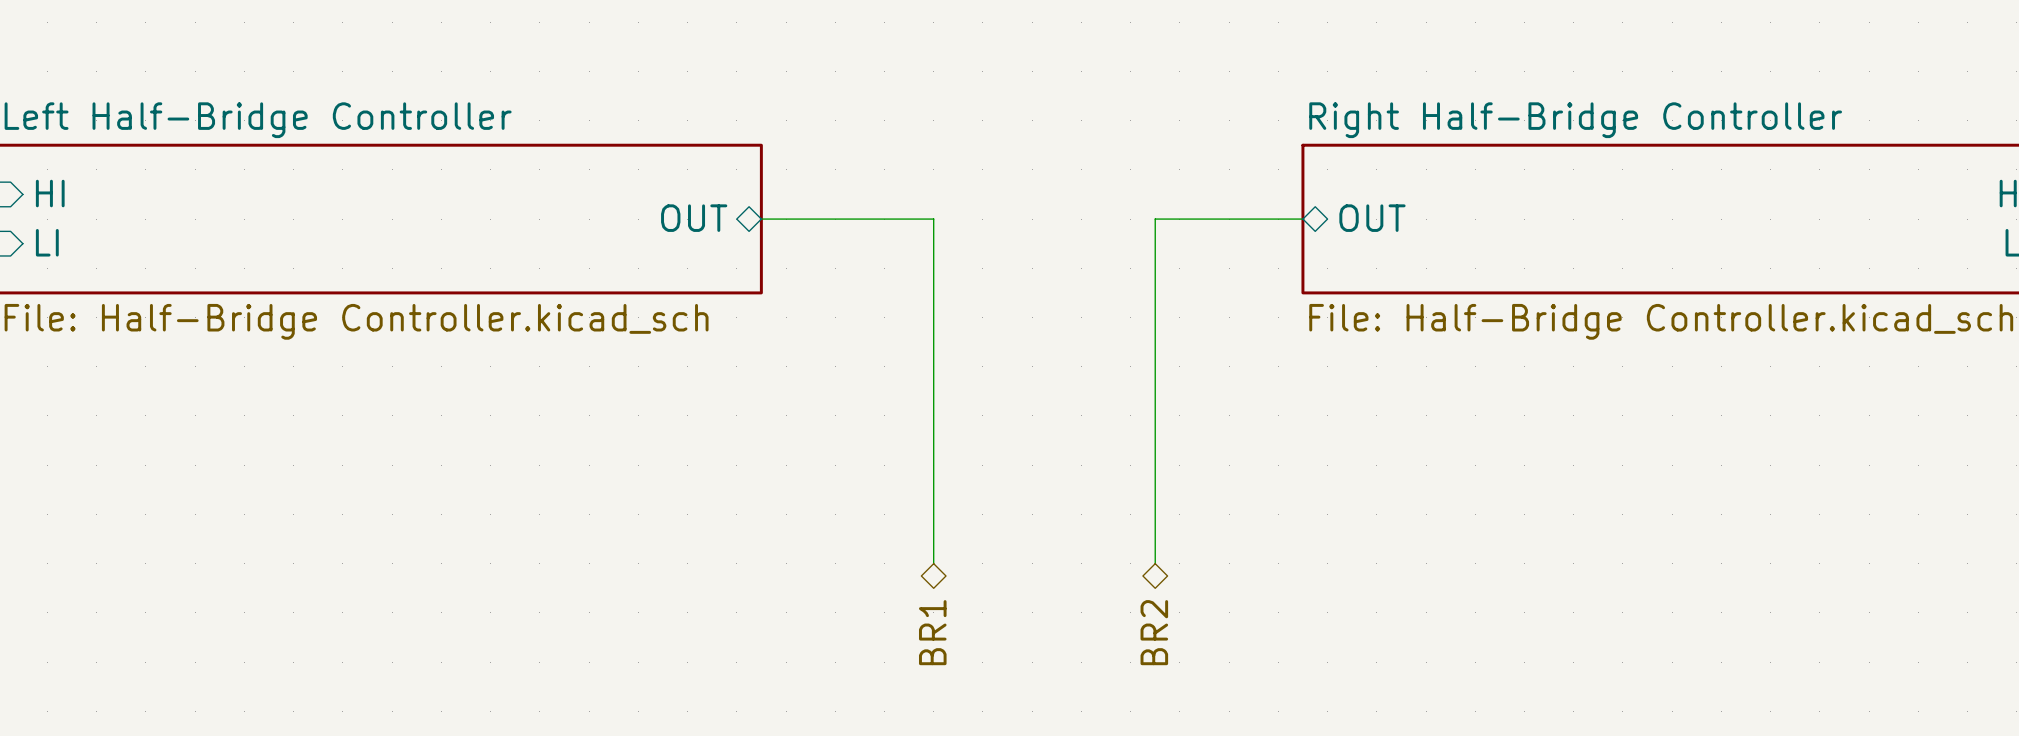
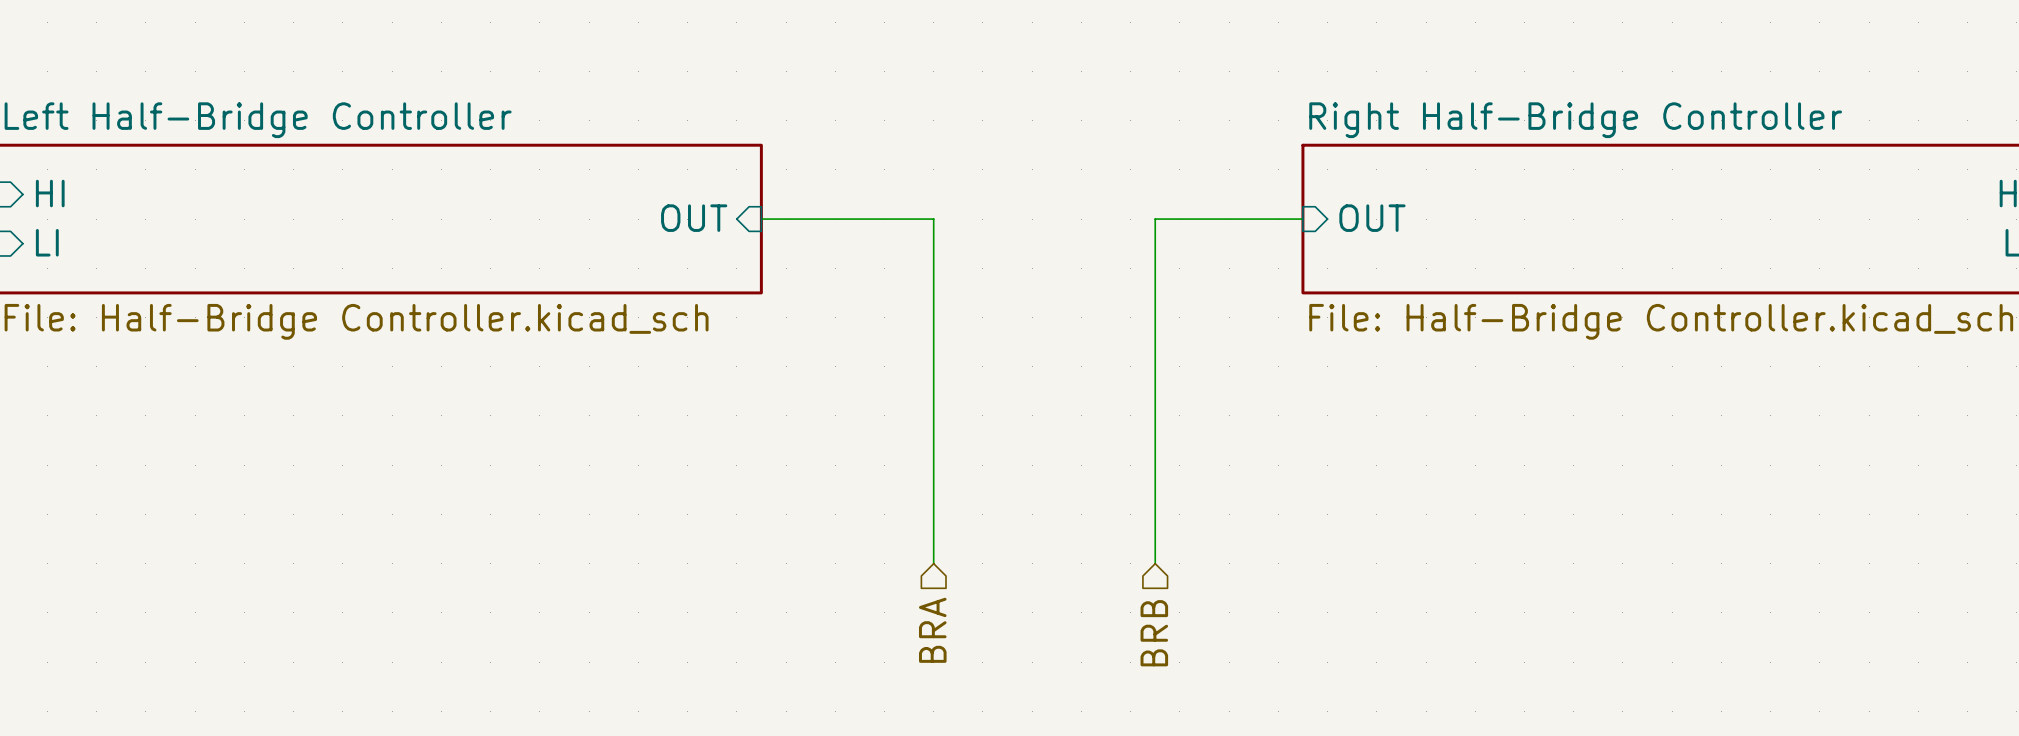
sheet pin shape: bidirectional (694, 218) -> input (694, 218)
sheet pin shape: bidirectional (1372, 218) -> input (1372, 218)
hierarchical label shape: bidirectional (932, 632) -> input (932, 630)
hierarchical label: BR1 (932, 632) -> BRA (932, 630)
hierarchical label shape: bidirectional (1154, 632) -> input (1154, 633)
hierarchical label: BR2 (1154, 632) -> BRB (1154, 633)

